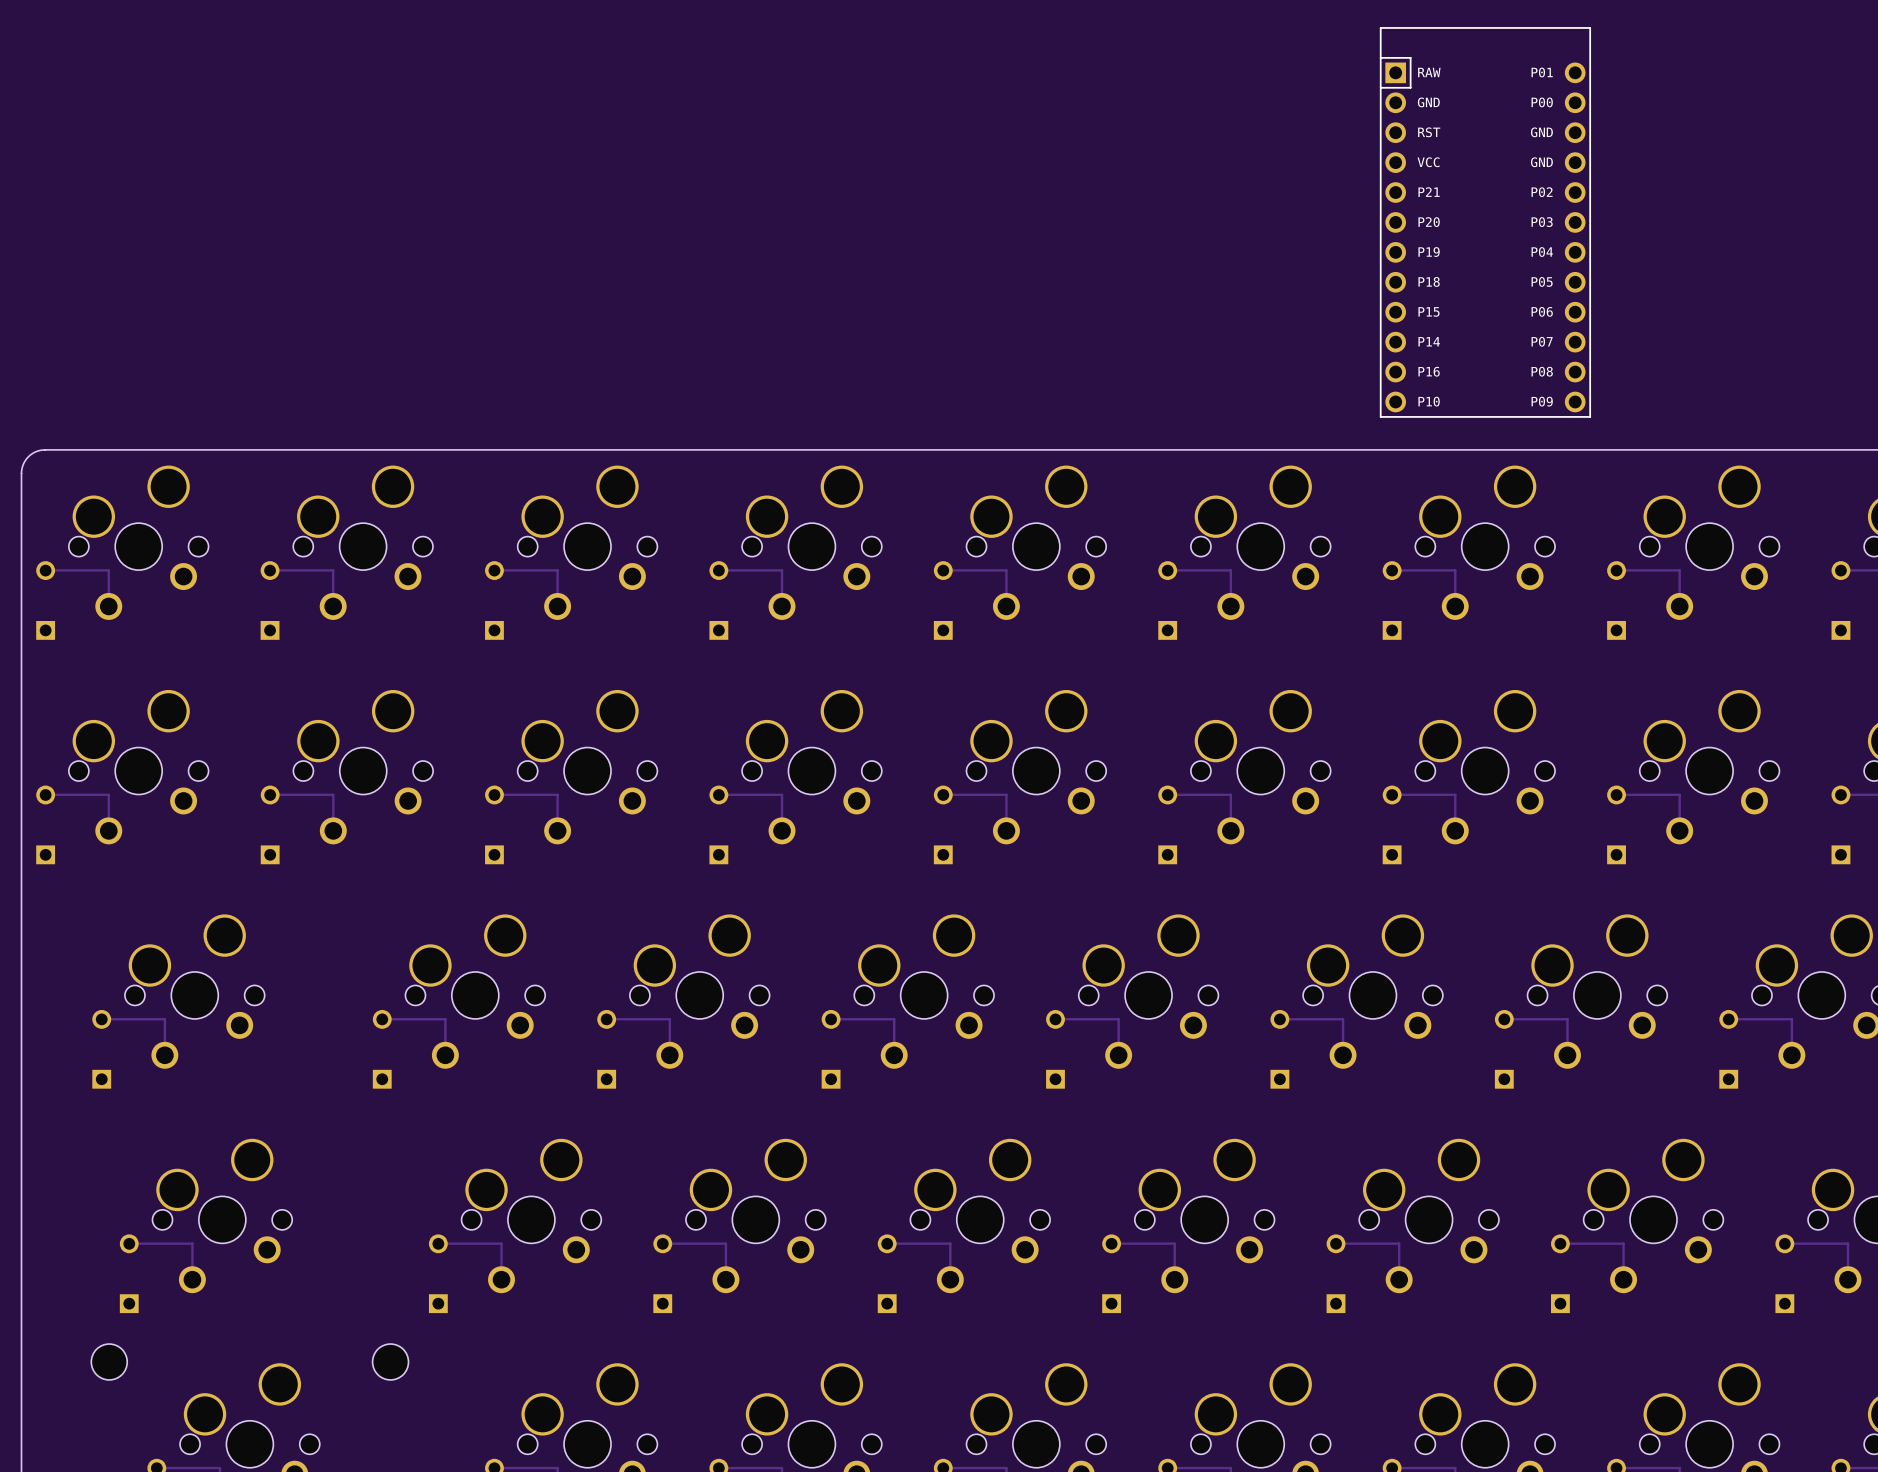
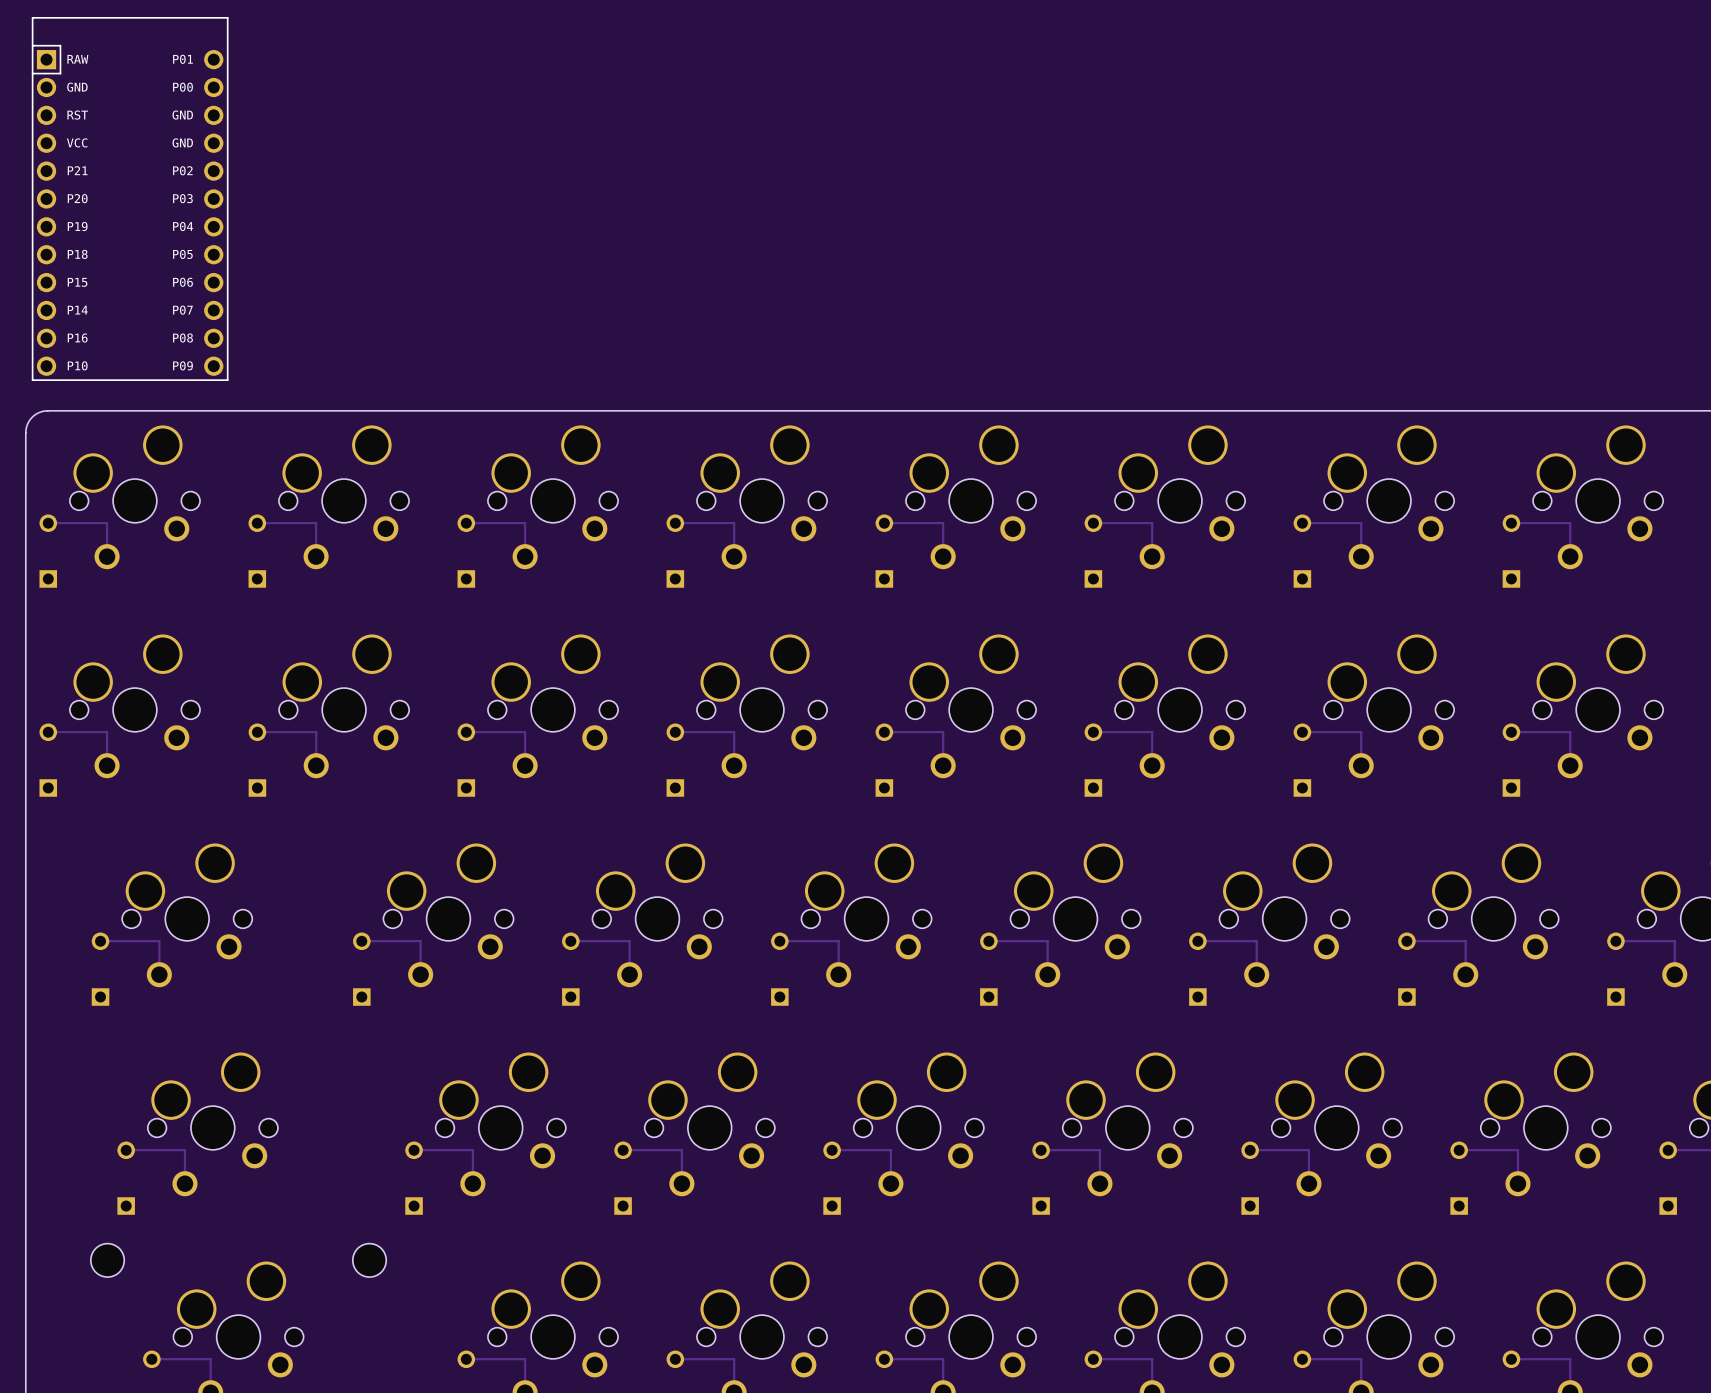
part: none -> (130, 198)
part: (1485, 222) -> none

